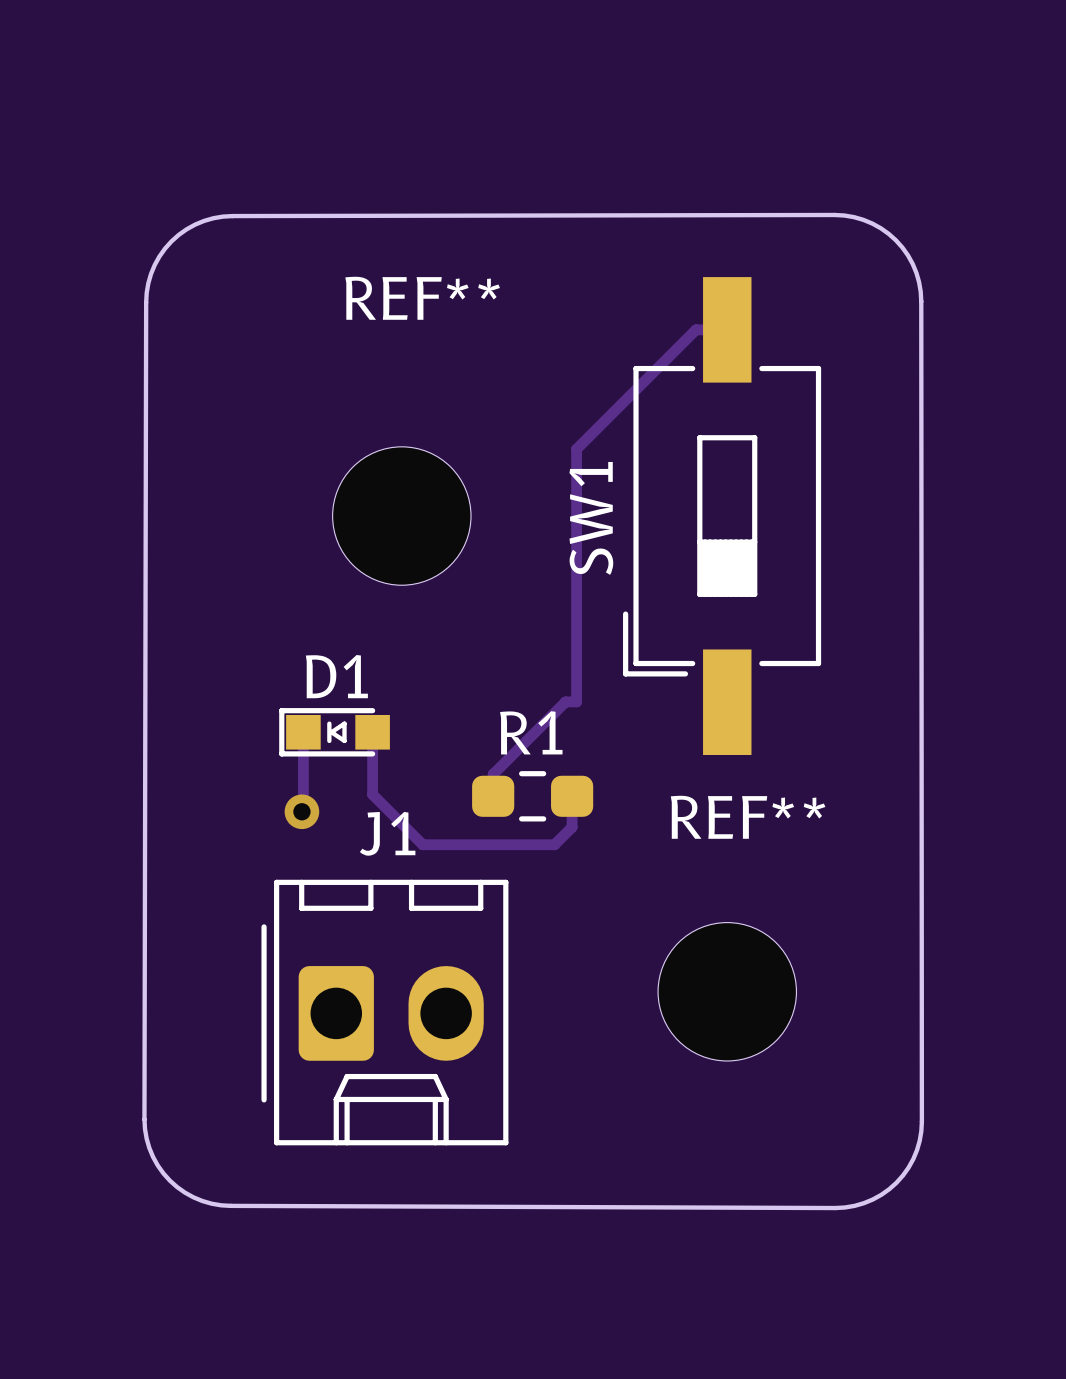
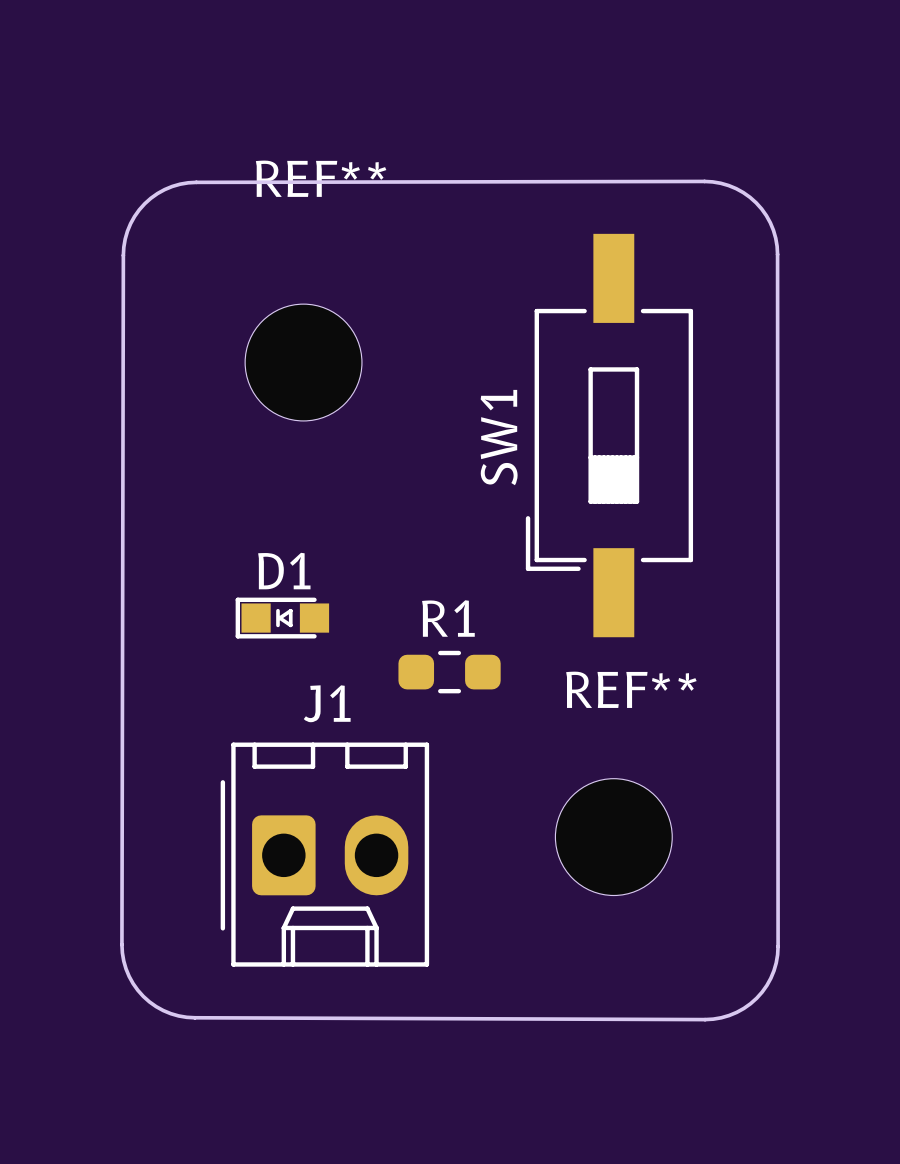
track: (727, 329) (695, 329) (576, 449) (576, 701) (565, 701) (493, 774) (493, 796) -> none
REF** position: (401, 516) -> (303, 362)
track: (303, 732) (301, 811) -> none
track: (372, 732) (372, 794) (422, 844) (554, 844) (572, 827) (572, 796) -> none
via: (301, 811) -> none

